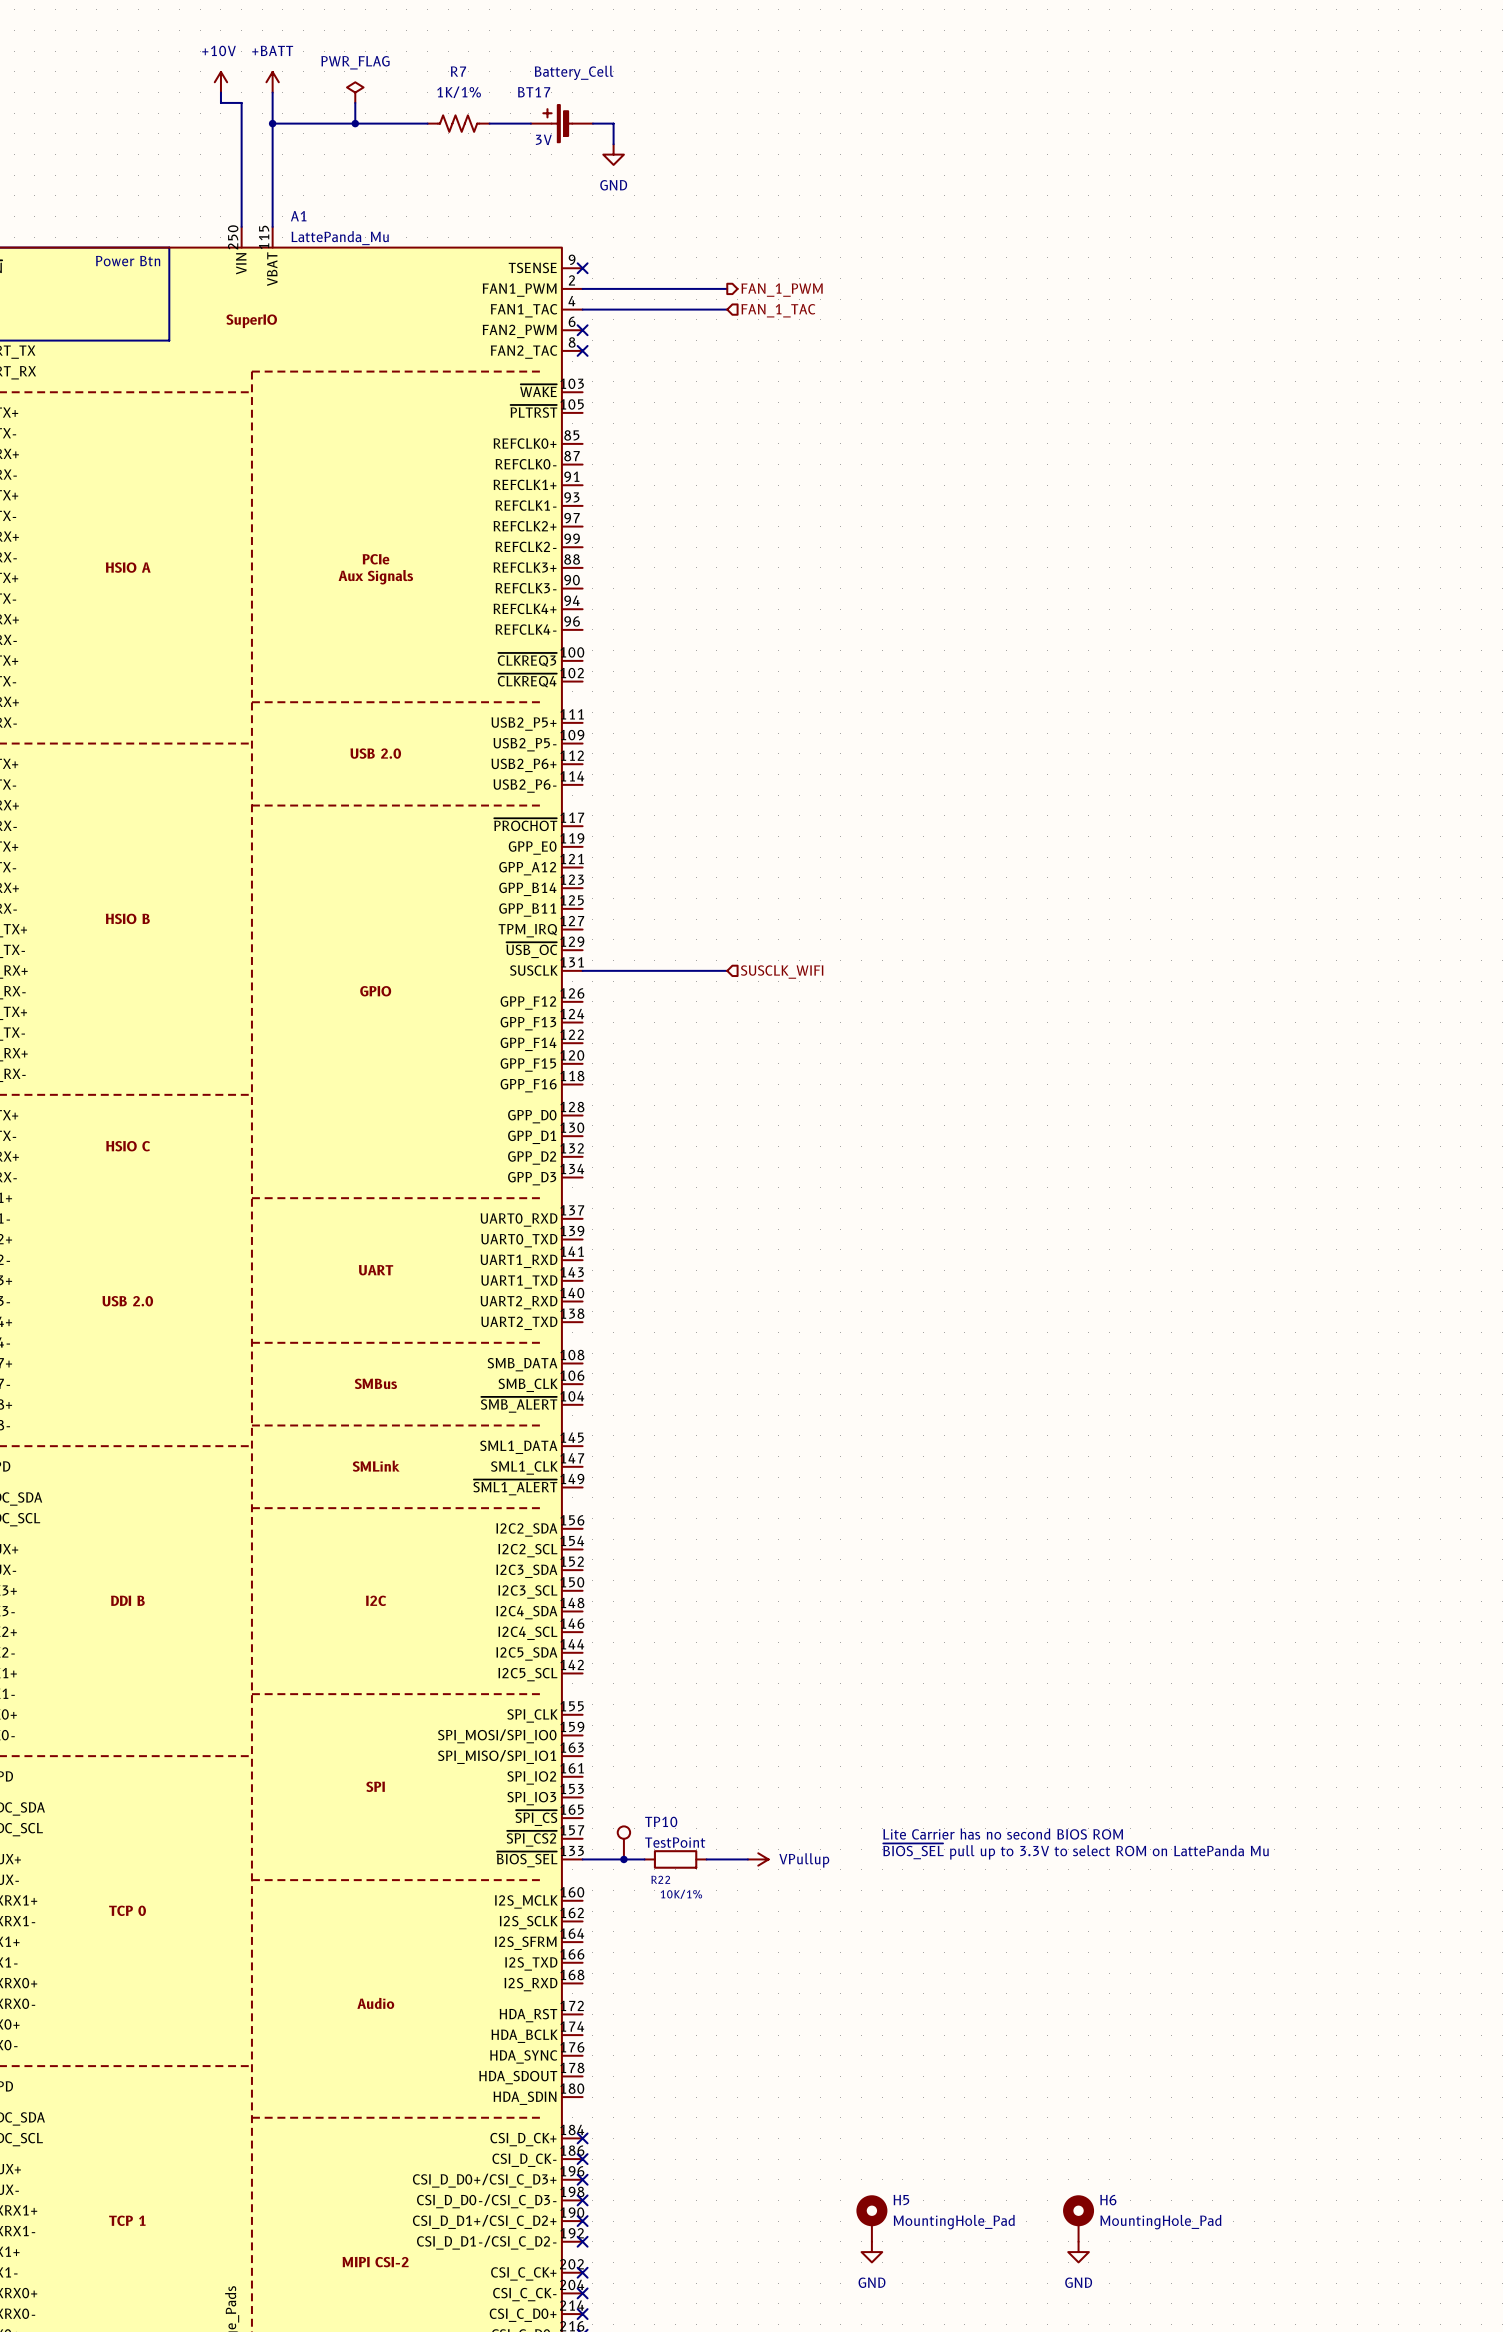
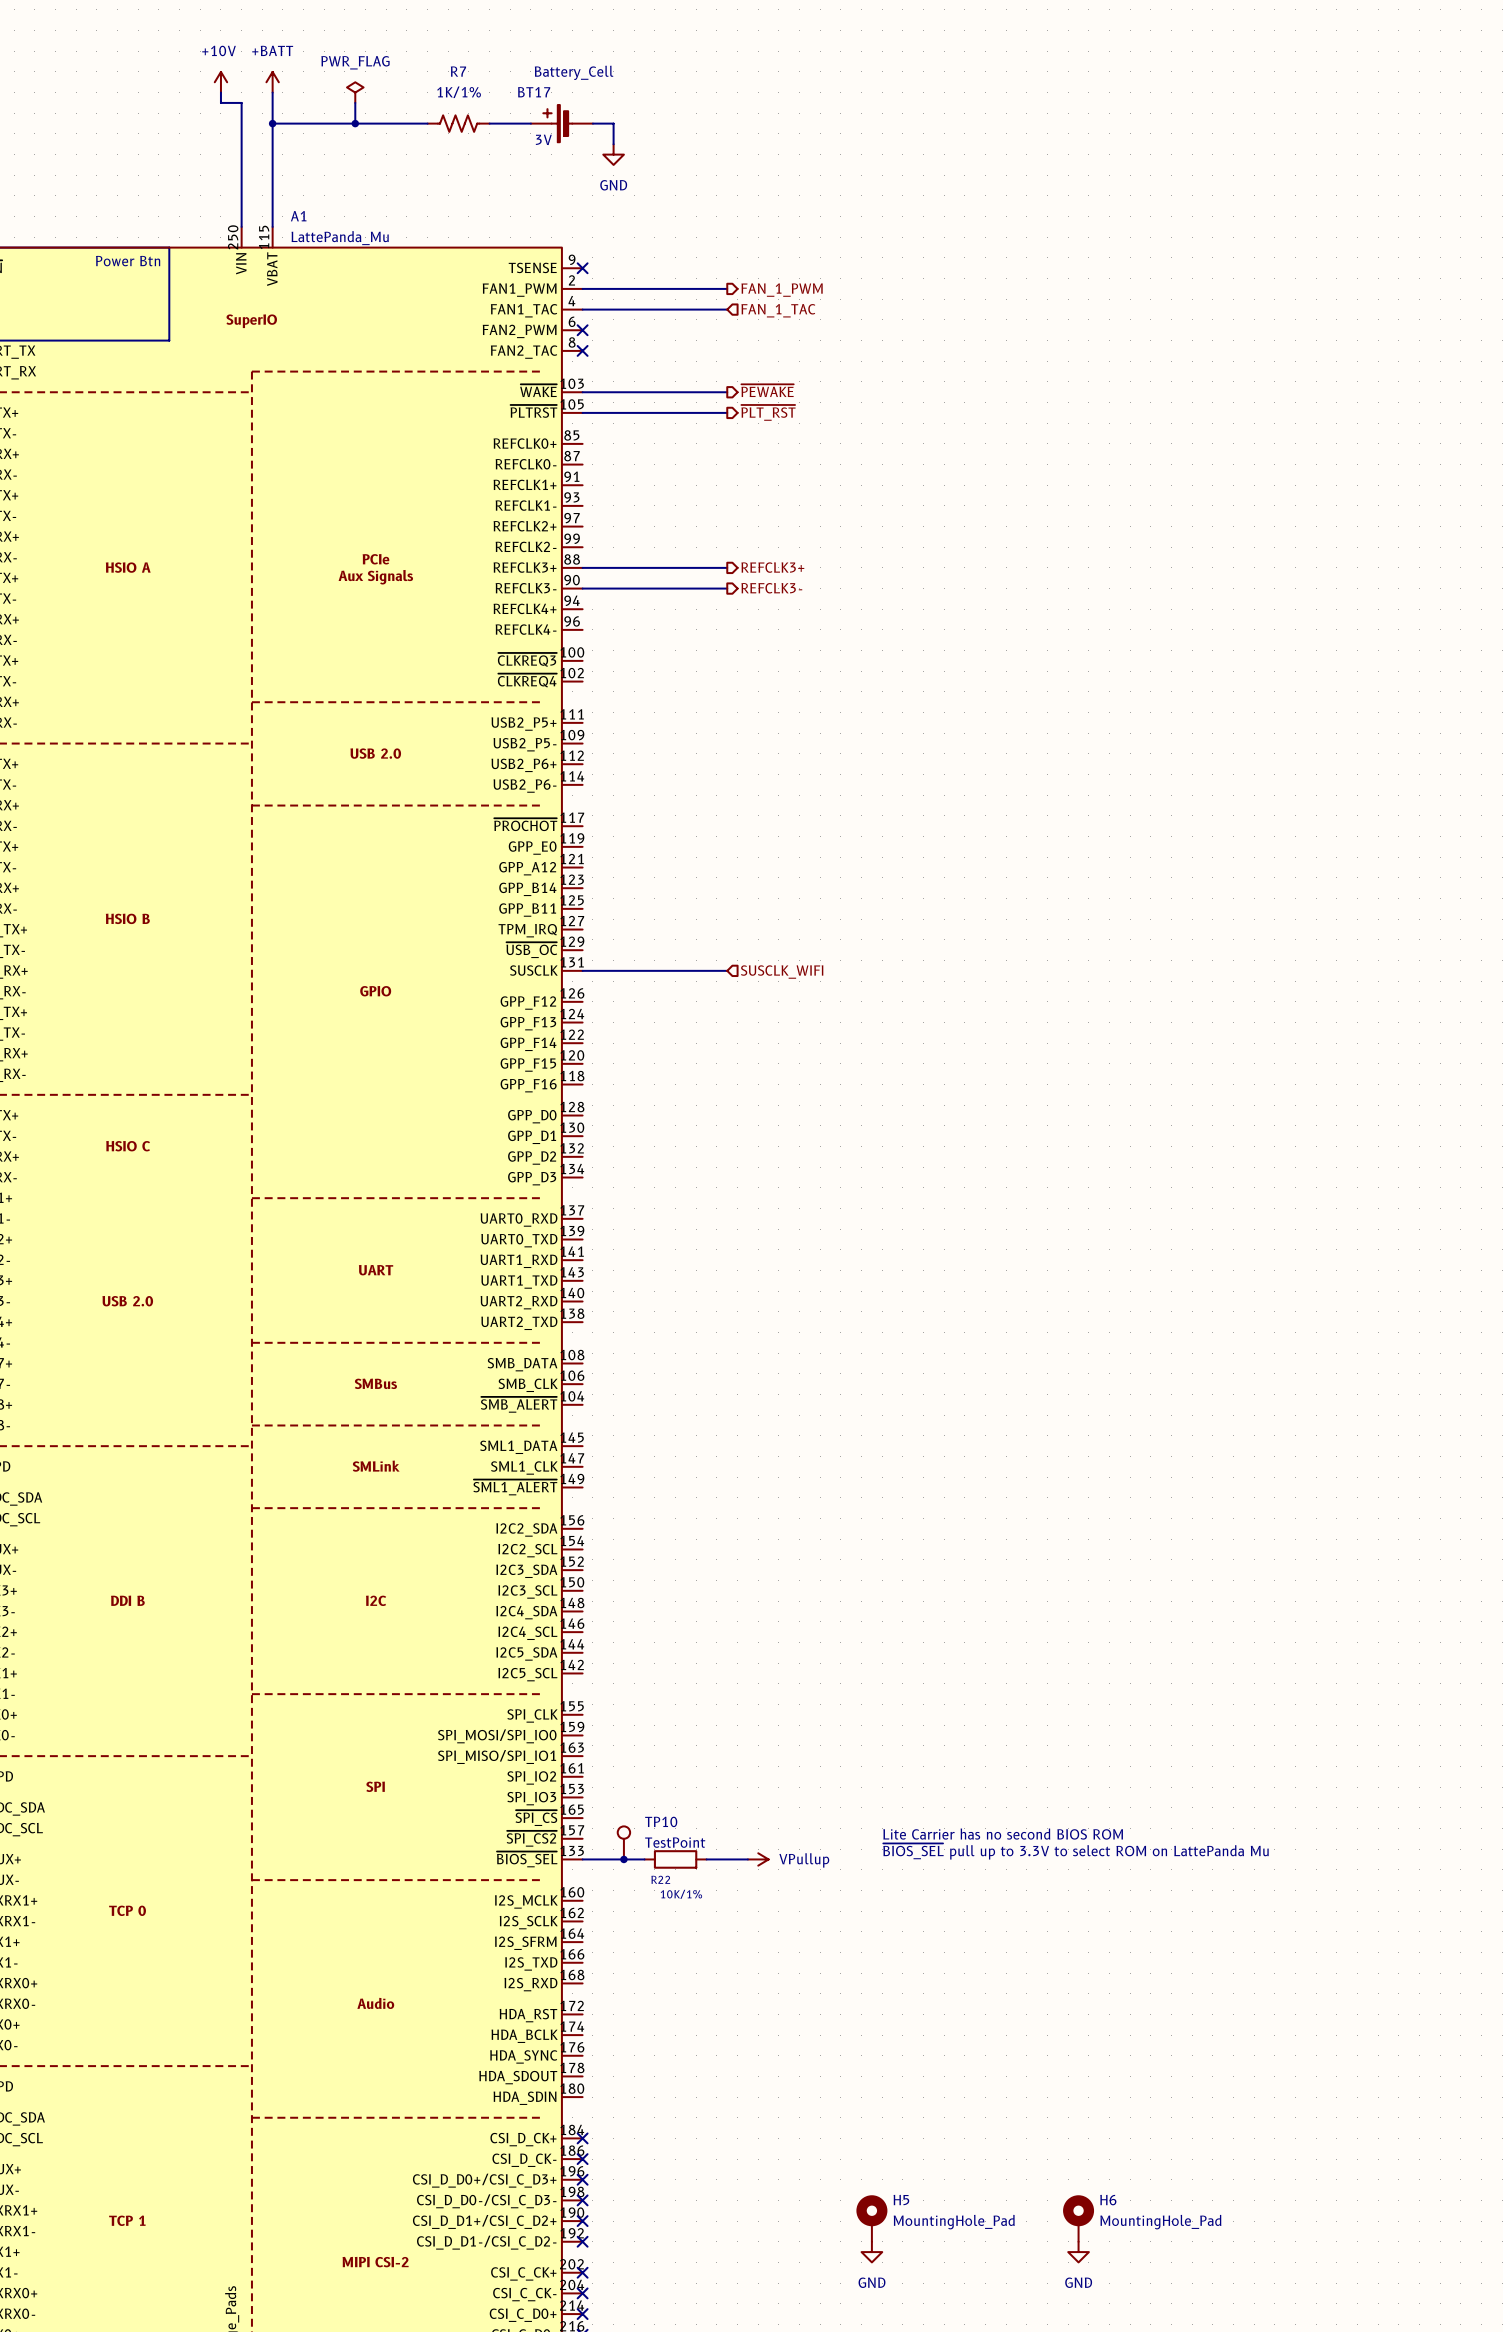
hierarchical label: none -> ~{PEWAKE} (767, 390)
wire: none -> (582, 392) (727, 392)
wire: none -> (582, 412) (727, 412)
hierarchical label: none -> ~{PLT_RST} (768, 412)
wire: none -> (582, 567) (727, 567)
hierarchical label: none -> REFCLK3+ (772, 567)
wire: none -> (582, 588) (727, 588)
hierarchical label: none -> REFCLK3- (771, 588)

